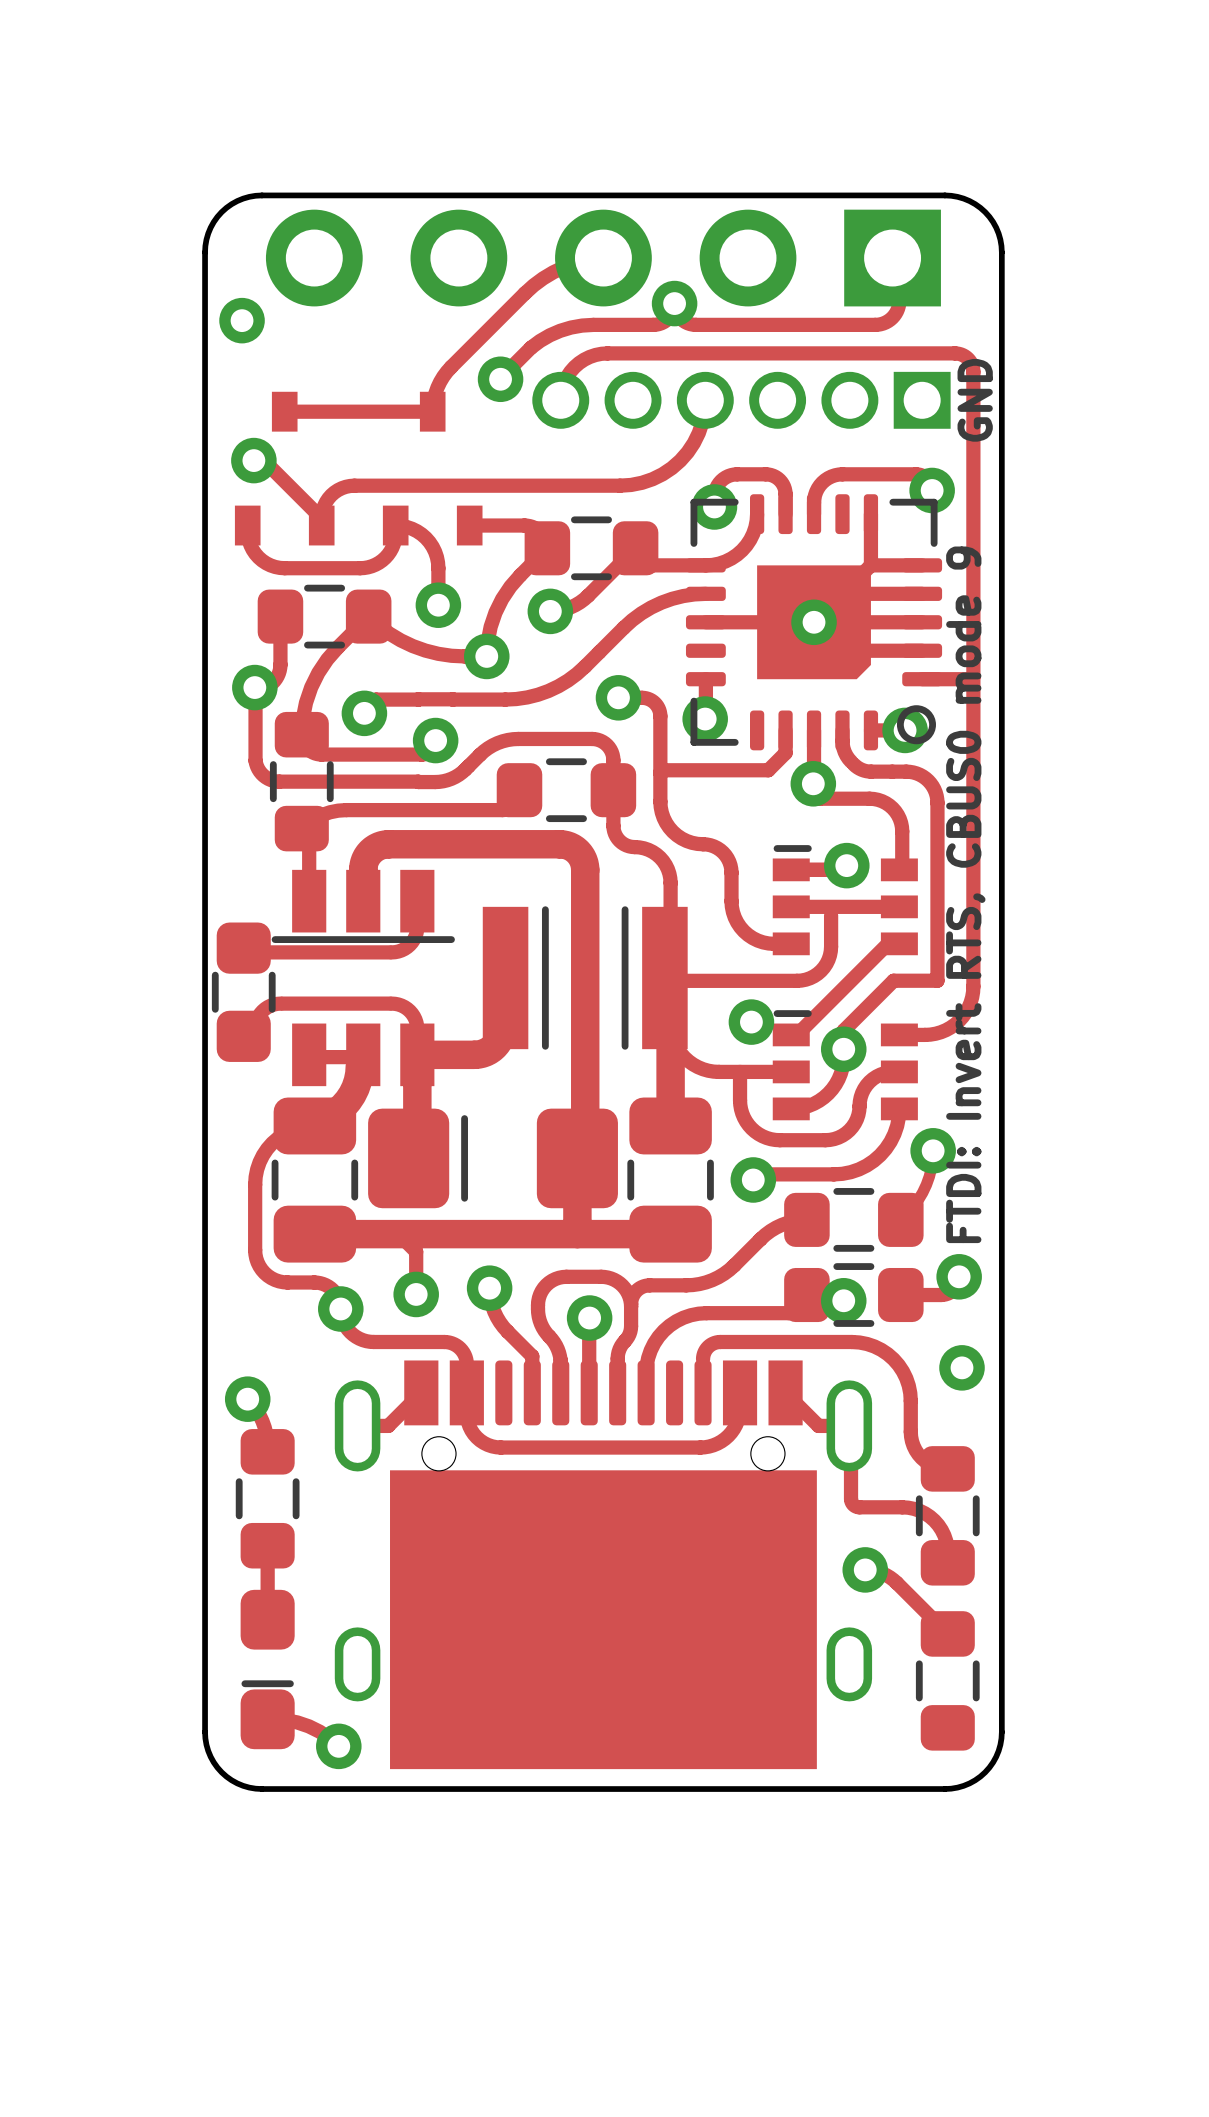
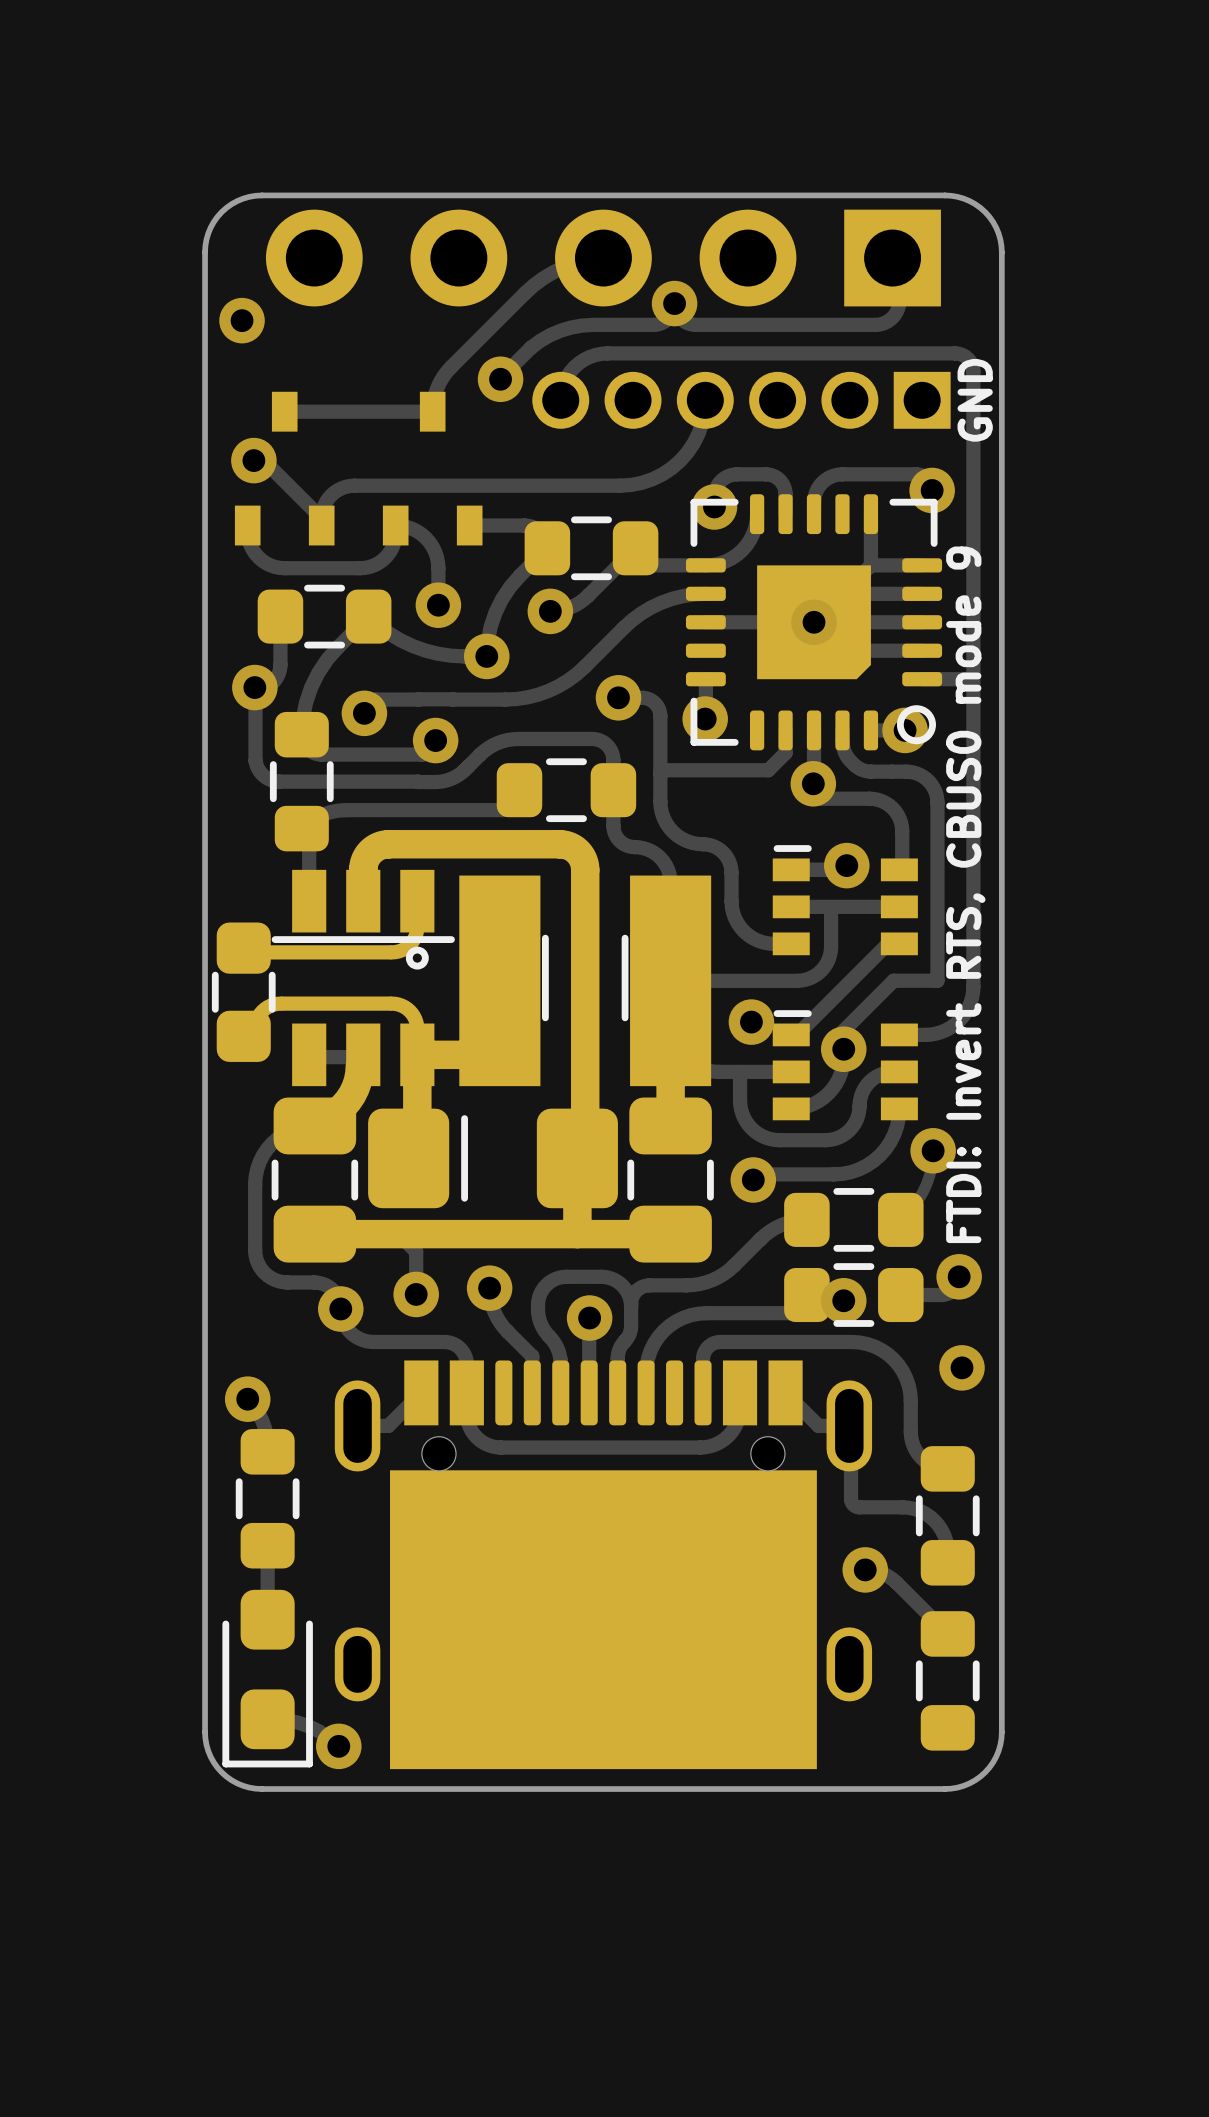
part footprint: [216, 830, 712, 1263] -> [216, 830, 712, 1263]
drawing shape: [541, 906, 629, 1050] -> [541, 934, 629, 1022]
part footprint: [240, 1589, 295, 1750] -> [222, 1589, 313, 1768]

